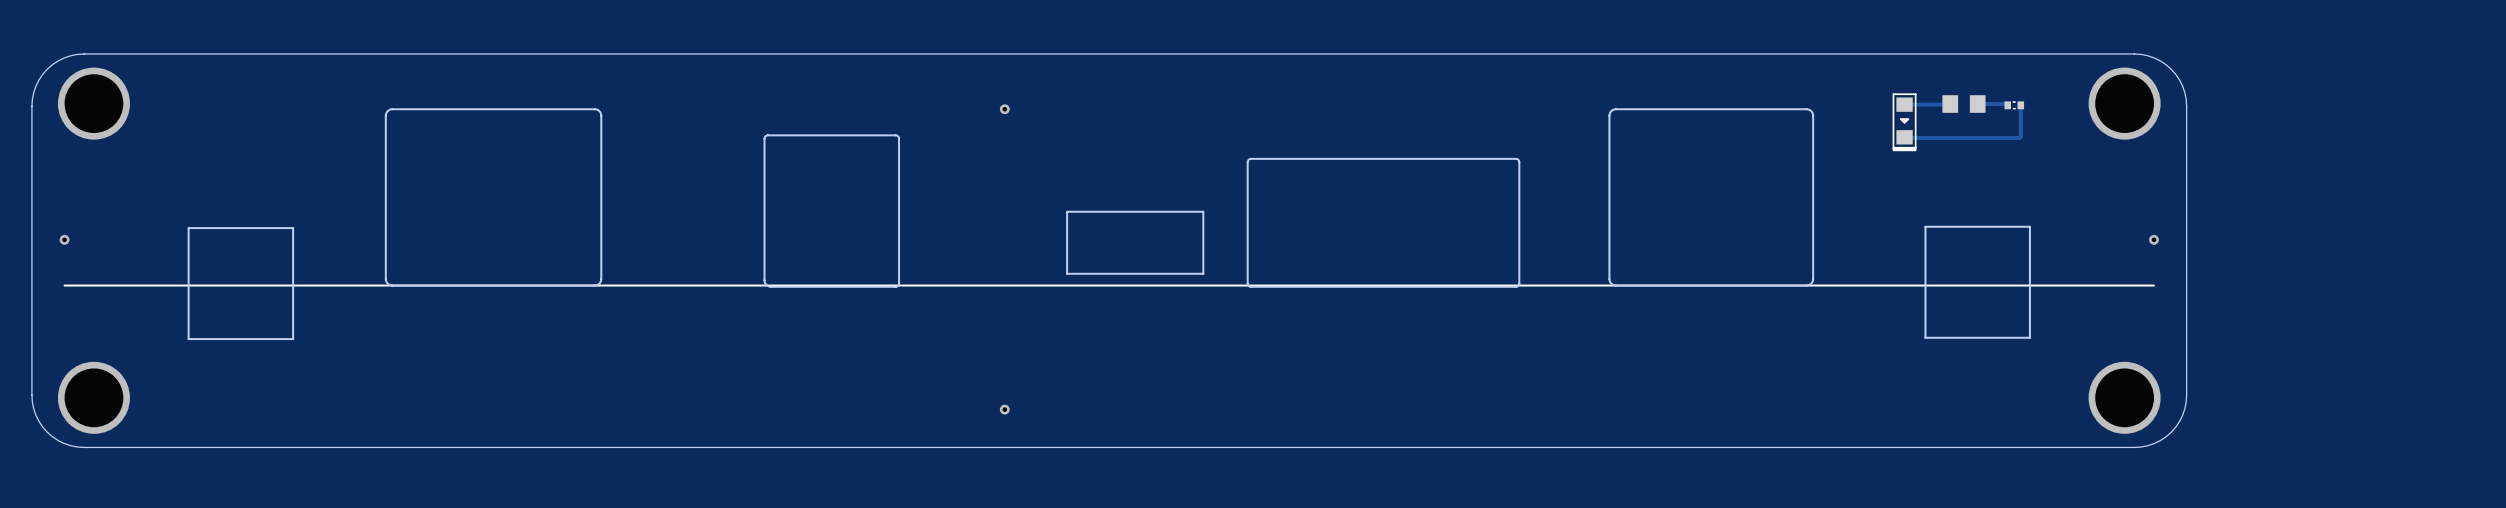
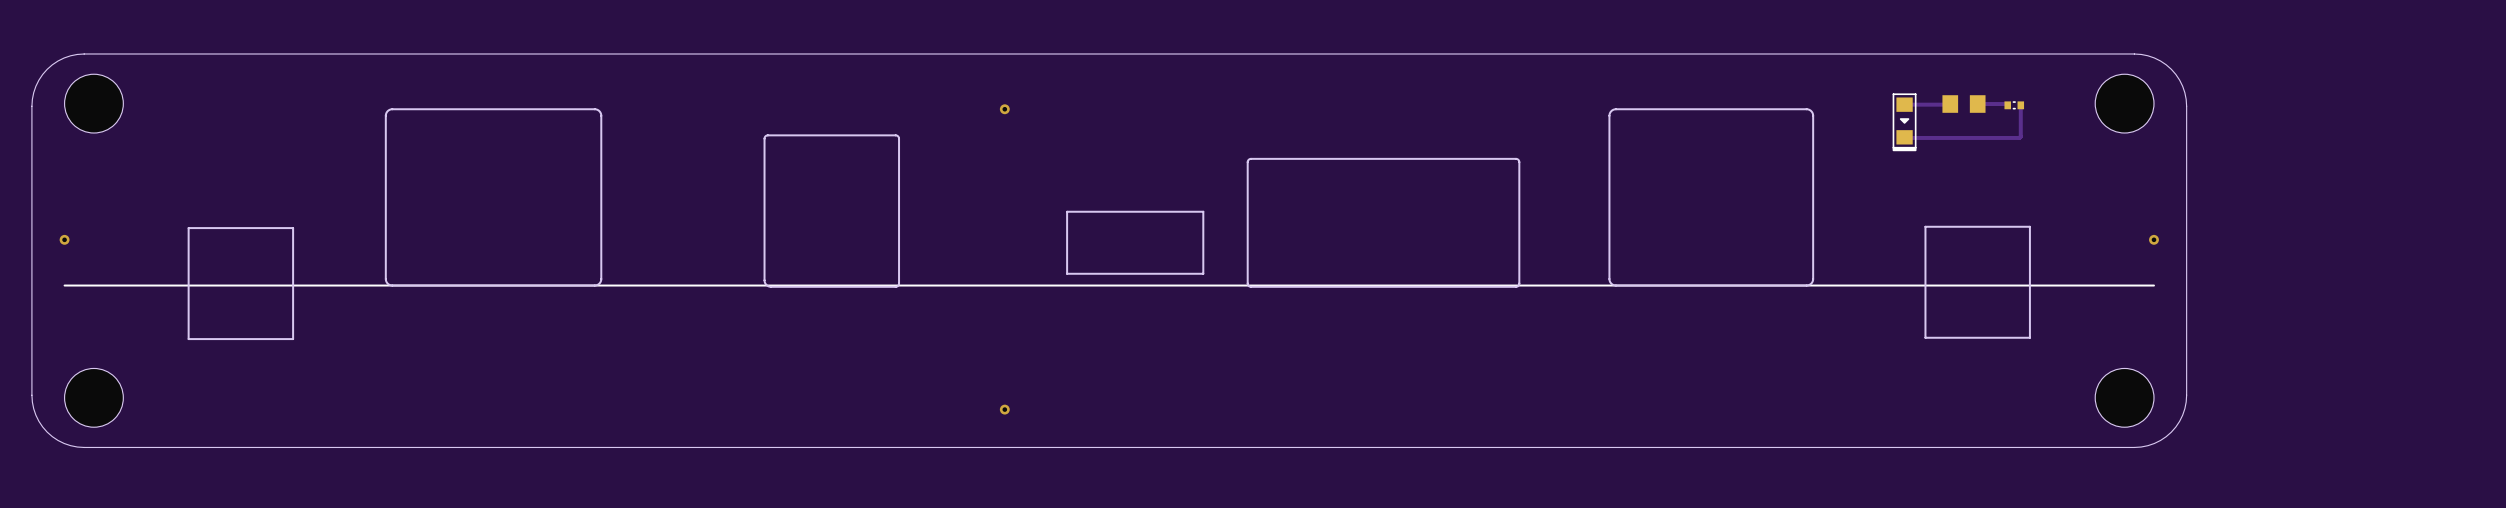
via: (93, 103) -> none
hole: none -> (93, 103)
via: (2124, 103) -> none
hole: none -> (2124, 103)
via: (93, 397) -> none
hole: none -> (93, 397)
via: (2124, 397) -> none
hole: none -> (2124, 397)

